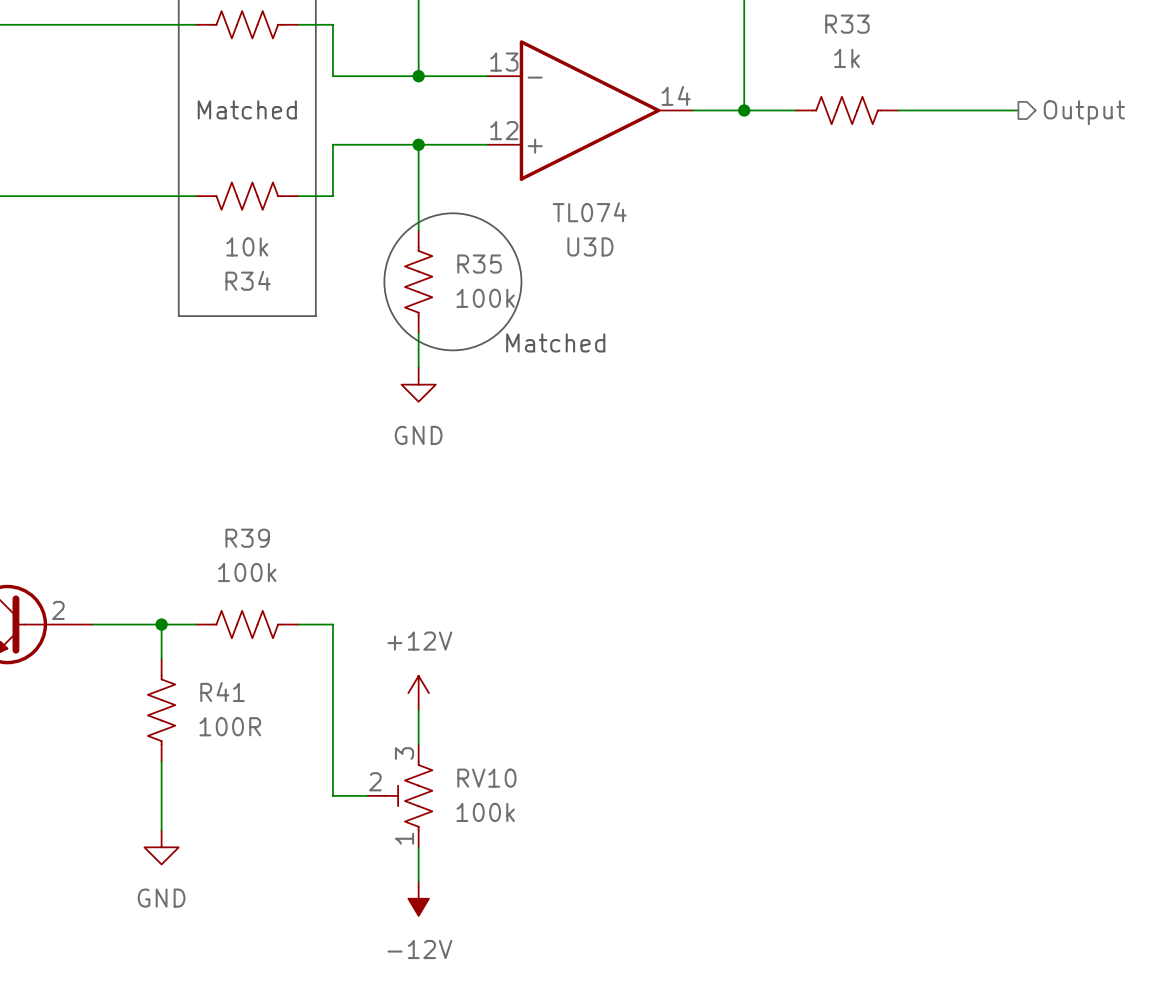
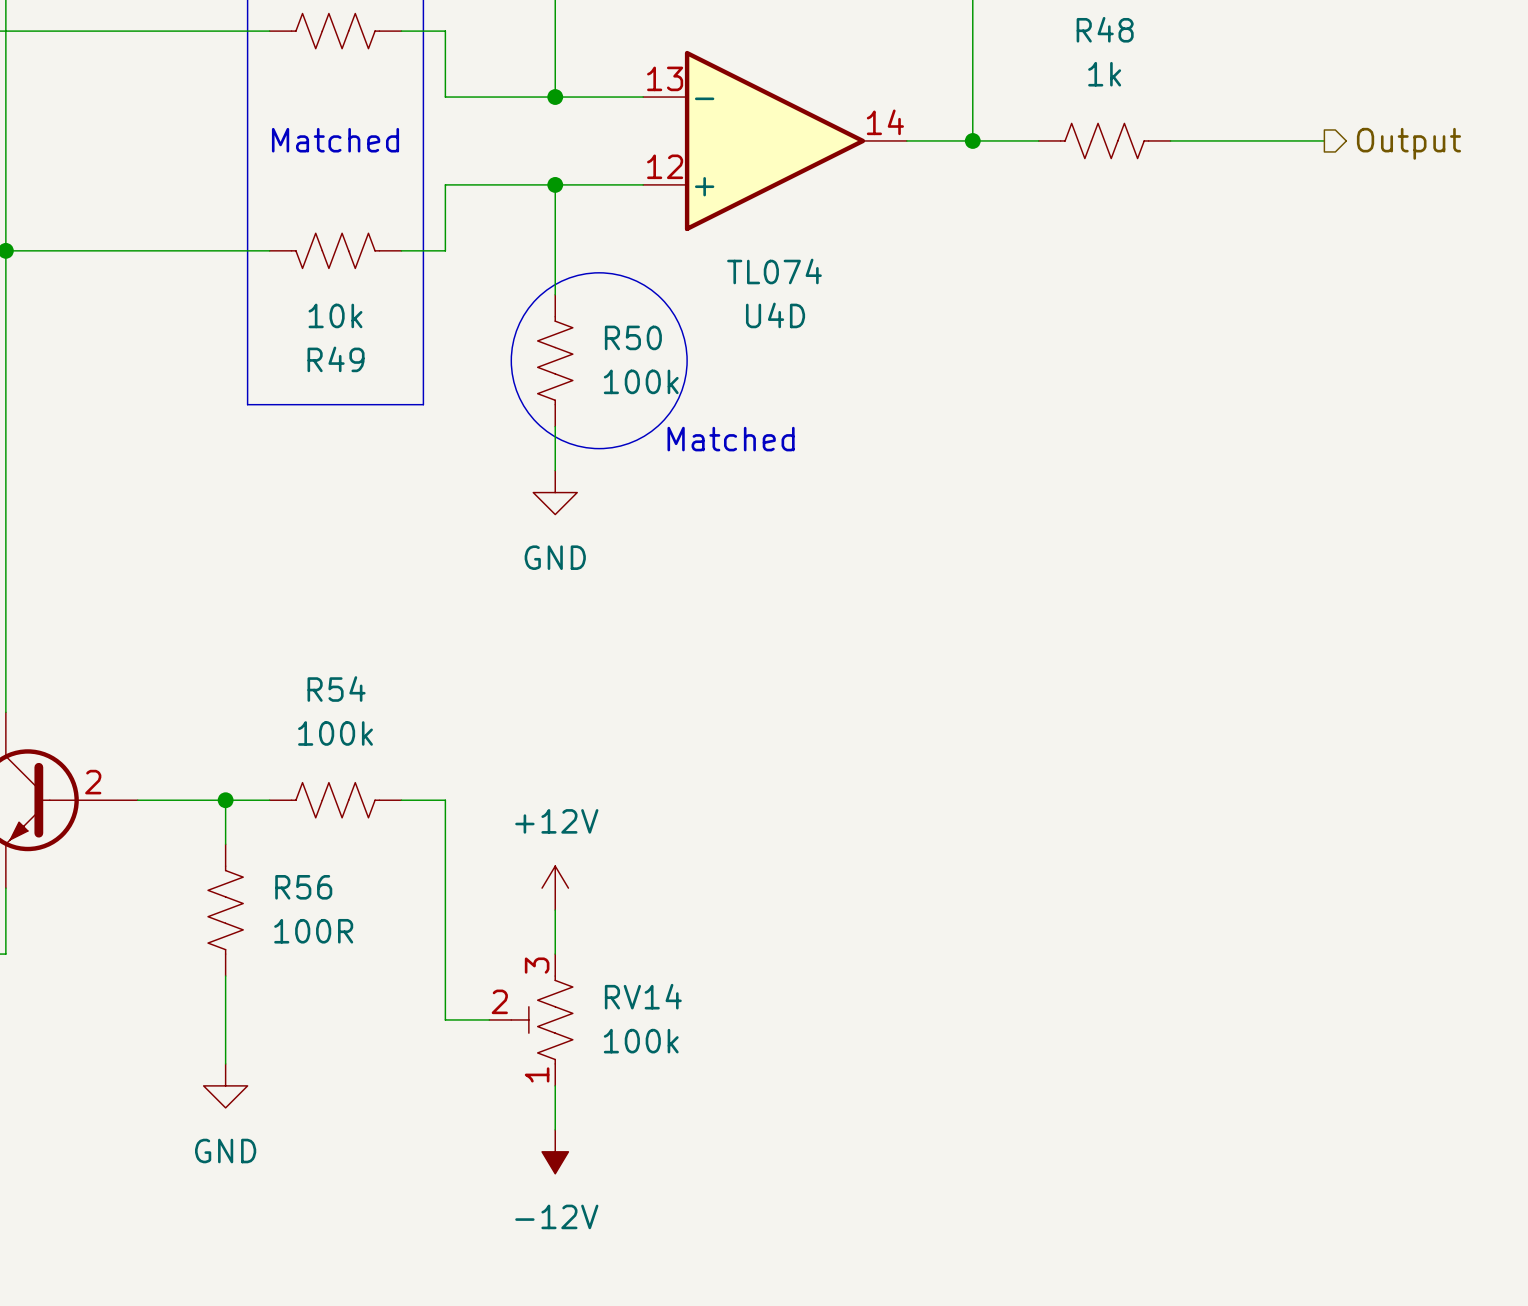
R33 name: R33 (847, 24) -> R48 (1105, 29)
U3D name: U3D (590, 246) -> U4D (775, 315)
R35 name: R35 (479, 264) -> R50 (633, 337)
R34 name: R34 (248, 280) -> R49 (336, 359)
R39 name: R39 (247, 538) -> R54 (336, 689)
R41 name: R41 (222, 692) -> R56 (303, 887)
RV10 name: RV10 (486, 778) -> RV14 (643, 996)

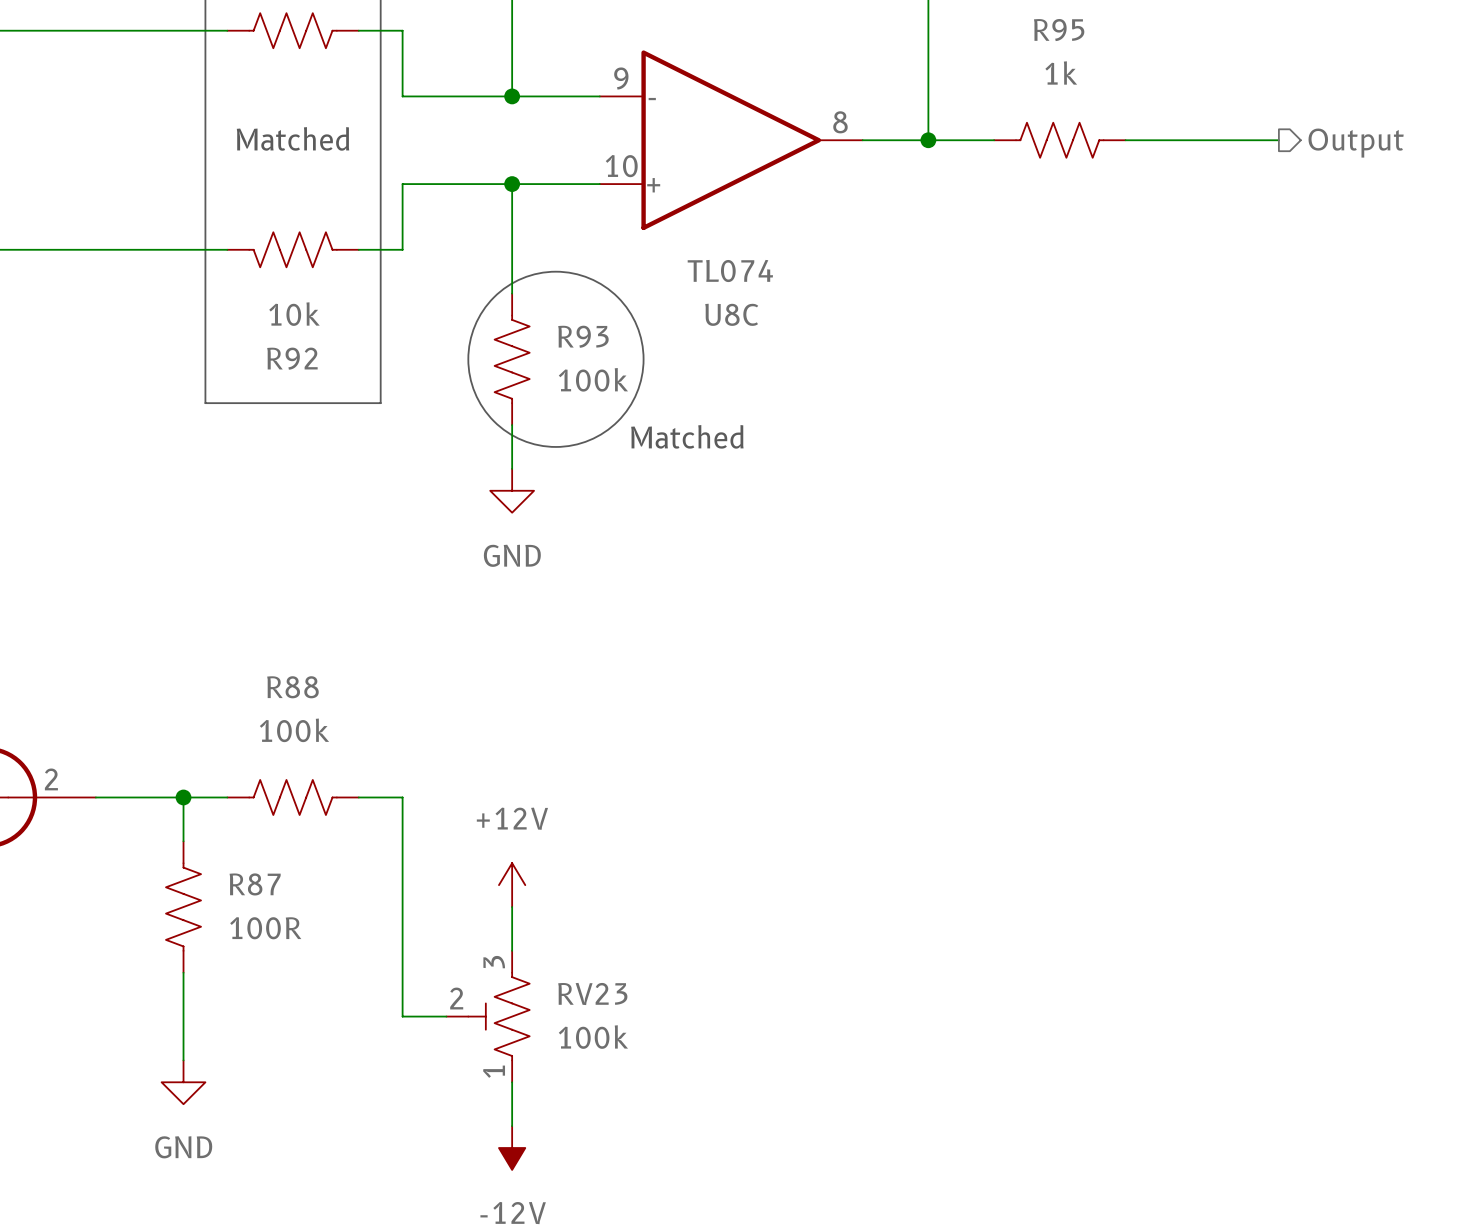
R48 name: R48 (1105, 29) -> R95 (1059, 30)
U4D pin number: 13 (665, 78) -> 9 (621, 78)
U4D pin number: 14 (885, 122) -> 8 (840, 122)
U4D pin number: 12 (665, 166) -> 10 (621, 166)
U4D name: U4D (775, 315) -> U8C (731, 314)
R50 name: R50 (633, 337) -> R93 (583, 336)
R49 name: R49 (336, 359) -> R92 (292, 358)
R54 name: R54 (336, 689) -> R88 (292, 687)
R56 name: R56 (303, 887) -> R87 (255, 884)
RV14 name: RV14 (643, 996) -> RV23 (592, 993)

